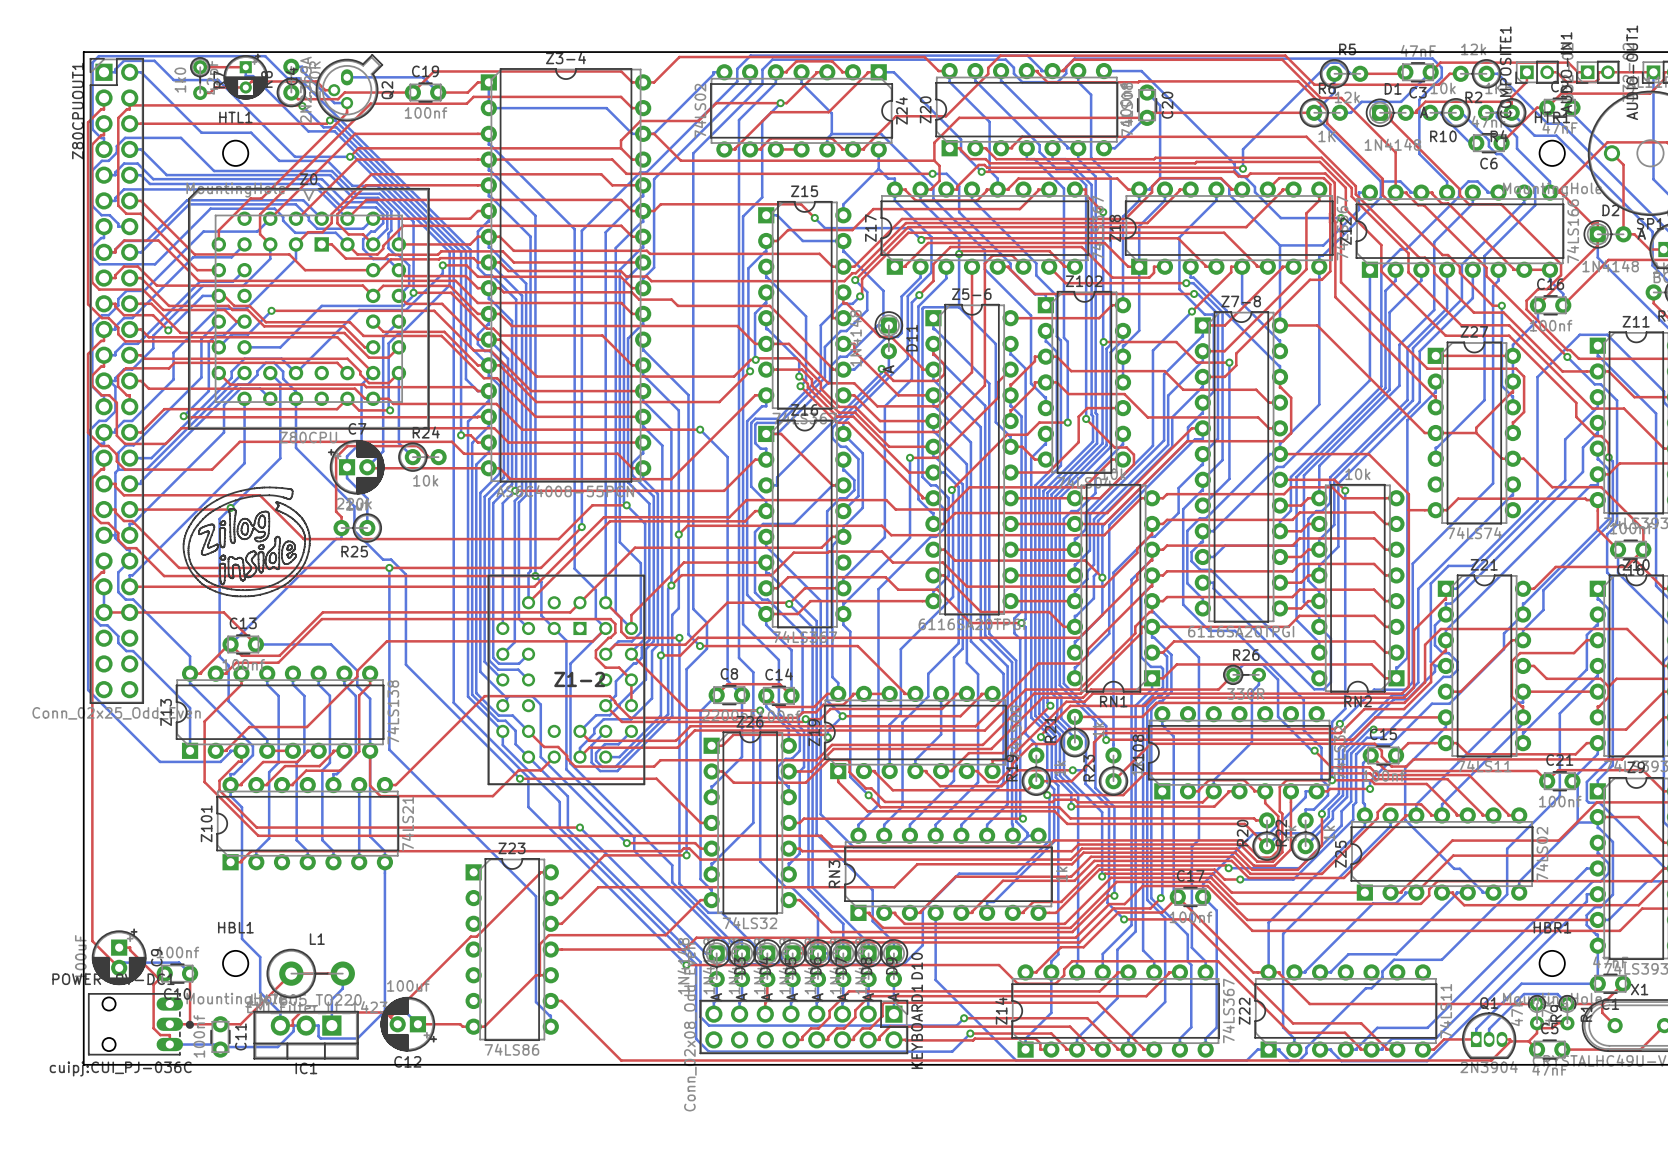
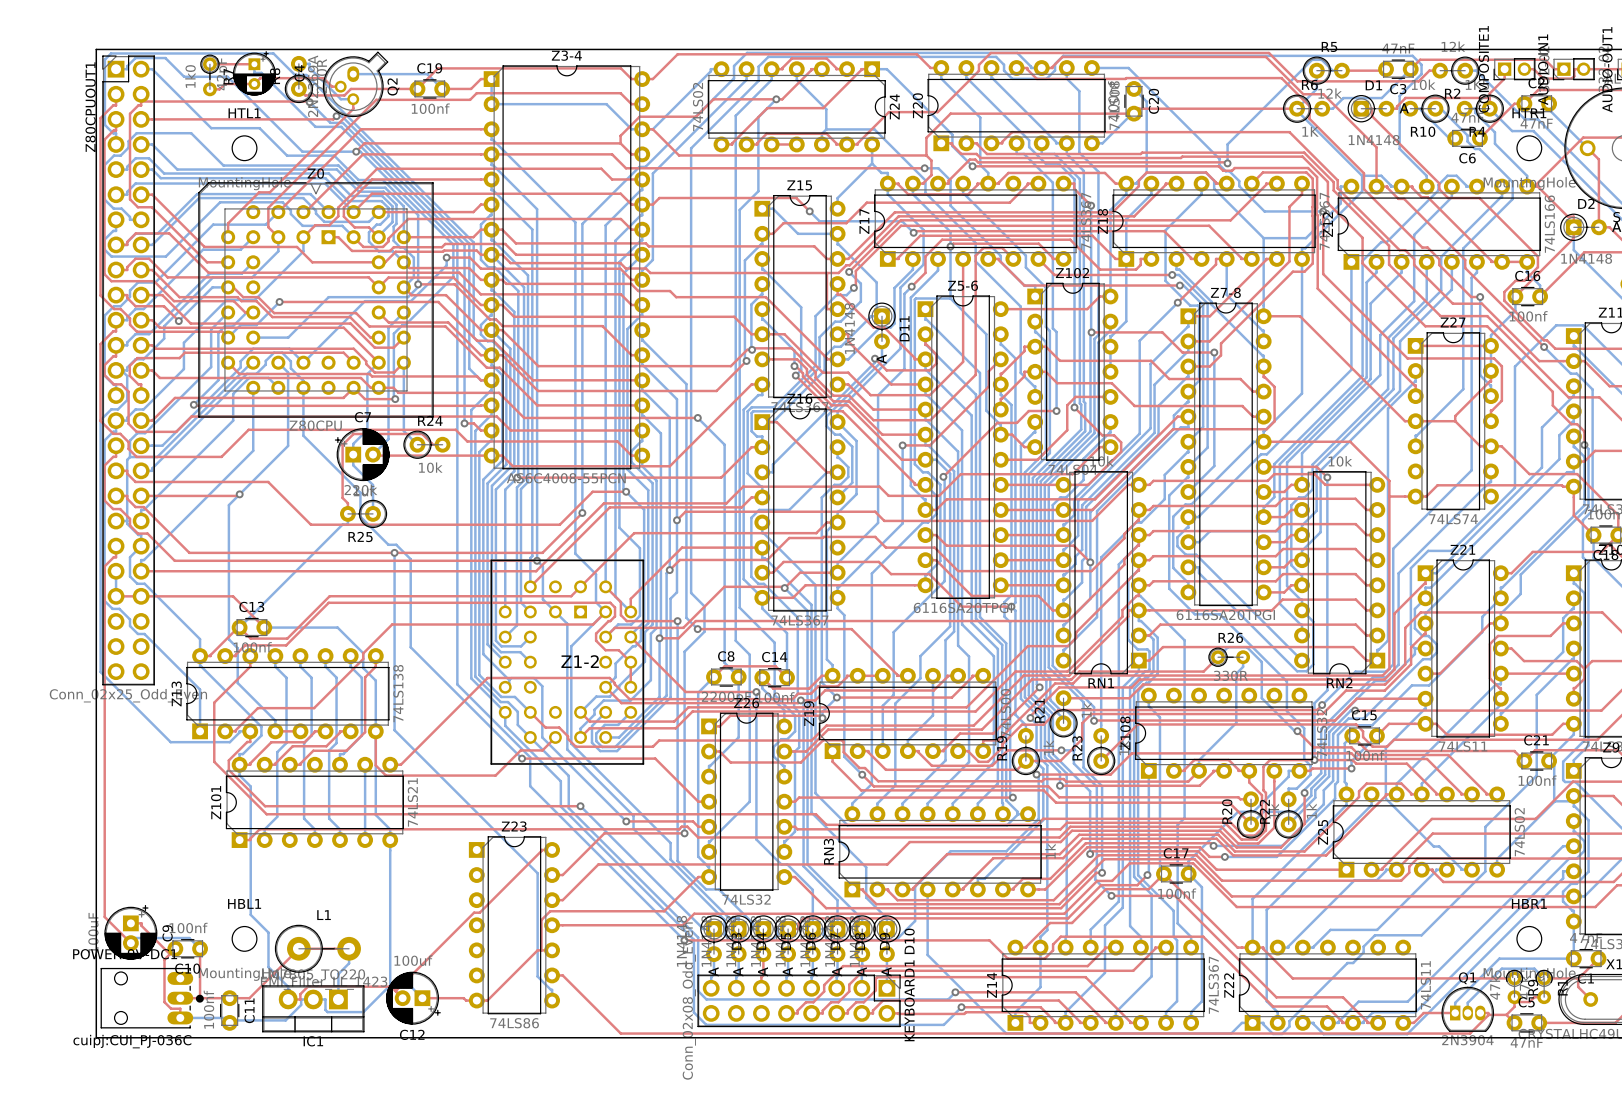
line: (269, 487) (247, 489) (222, 497) (204, 508) (190, 524) (184, 538) (184, 556) (191, 571) (205, 586) (218, 592) (233, 596) (260, 594) (285, 584) (302, 567) (309, 548) (307, 528) (301, 517) (296, 512) (277, 502) (278, 505) (276, 509) (296, 522) (302, 530) (305, 537) (304, 549) (299, 563) (282, 580) (259, 588) (227, 588) (211, 583) (202, 577) (190, 561) (188, 548) (191, 535) (200, 522) (213, 510) (231, 501) (248, 497) (272, 495) (289, 499) (291, 497) (291, 489) (269, 487) -> none
line: (231, 508) (235, 511) (233, 543) (230, 539) (229, 510) (231, 508) -> none
line: (265, 511) (268, 512) (269, 518) (268, 533) (266, 538) (260, 541) (255, 540) (255, 537) (262, 537) (265, 533) (254, 528) (247, 538) (239, 537) (237, 530) (240, 520) (246, 519) (253, 525) (257, 515) (265, 511) -> none
line: (262, 515) (265, 521) (262, 527) (258, 523) (262, 515) -> none
line: (223, 521) (220, 523) (221, 525) (225, 523) (223, 521) -> none
line: (246, 523) (243, 524) (241, 529) (245, 534) (248, 530) (246, 523) -> none
line: (211, 524) (214, 527) (207, 546) (217, 544) (217, 547) (214, 551) (203, 554) (201, 552) (208, 532) (199, 534) (199, 530) (202, 527) (211, 524) -> none
line: (222, 527) (220, 529) (219, 535) (220, 545) (222, 547) (225, 529) (222, 527) -> none
line: (277, 536) (280, 539) (279, 567) (273, 567) (269, 569) (265, 564) (265, 557) (274, 545) (277, 536) -> none
line: (288, 541) (284, 544) (282, 552) (282, 561) (285, 564) (290, 562) (296, 555) (293, 553) (289, 557) (287, 556) (294, 546) (293, 542) (288, 541) -> none
line: (261, 545) (263, 547) (261, 549) (258, 547) (261, 545) -> none
line: (290, 545) (292, 548) (287, 550) (290, 545) -> none
line: (253, 551) (246, 557) (251, 567) (246, 575) (247, 577) (252, 575) (256, 570) (251, 560) (255, 554) (253, 551) -> none
line: (260, 552) (263, 552) (263, 555) (261, 572) (258, 563) (258, 553) (260, 552) -> none
line: (272, 552) (276, 558) (272, 563) (269, 560) (270, 555) (271, 553) (272, 553) (272, 552) -> none
line: (223, 555) (220, 557) (221, 559) (225, 558) (223, 555) -> none
line: (230, 557) (228, 559) (229, 576) (233, 577) (232, 566) (236, 564) (239, 567) (240, 579) (244, 580) (242, 559) (230, 557) -> none
line: (221, 563) (225, 565) (222, 584) (220, 574) (219, 564) (221, 563) -> none

